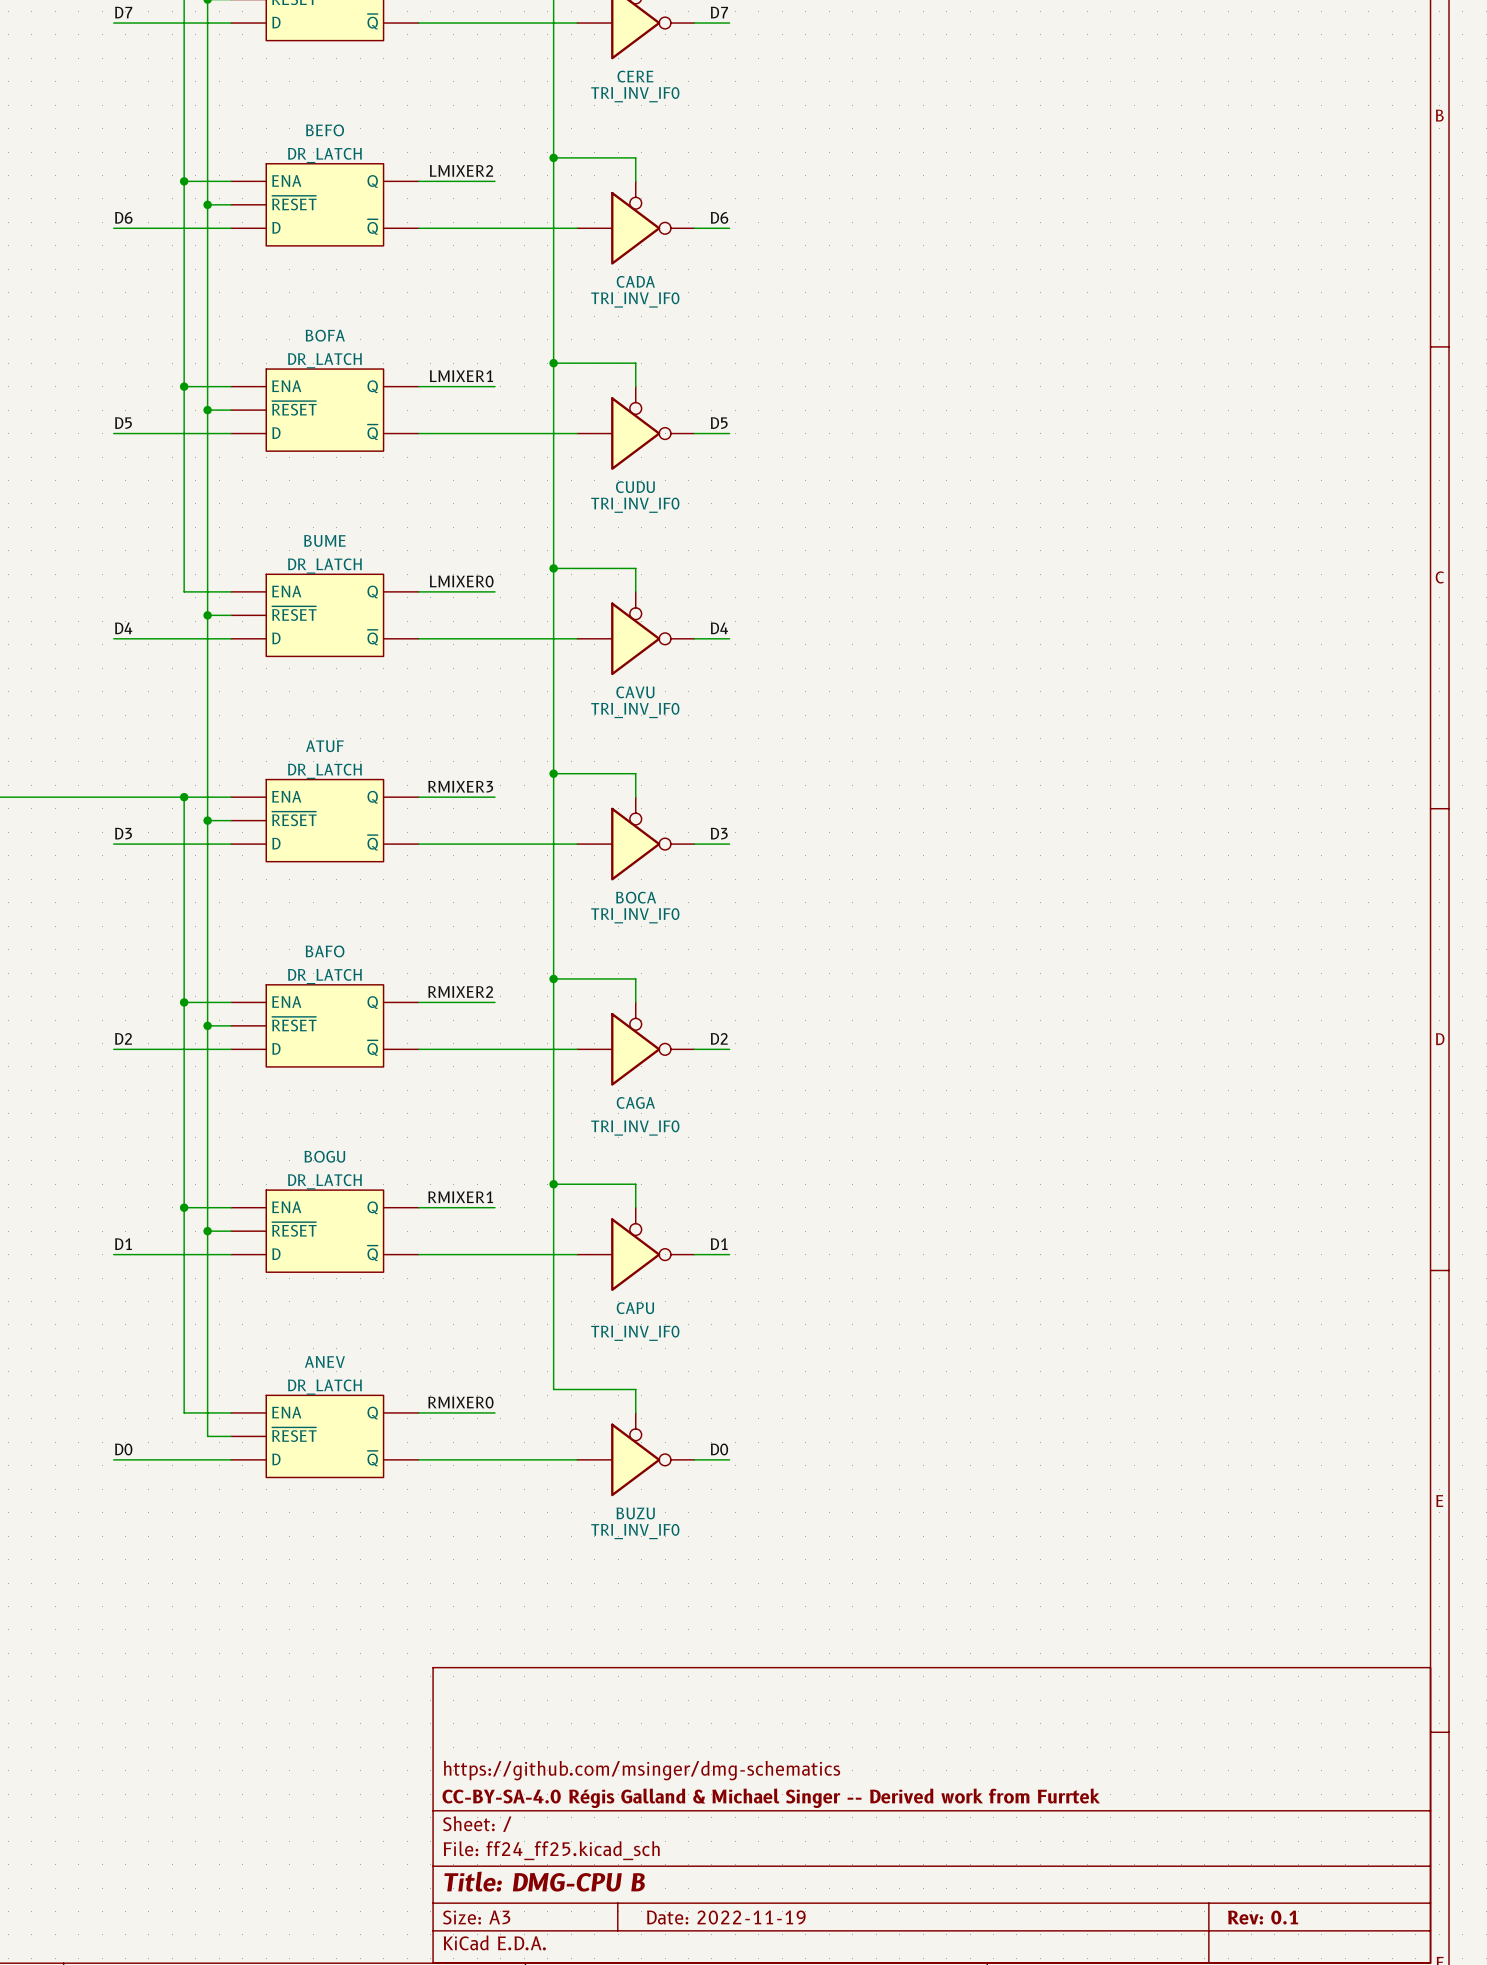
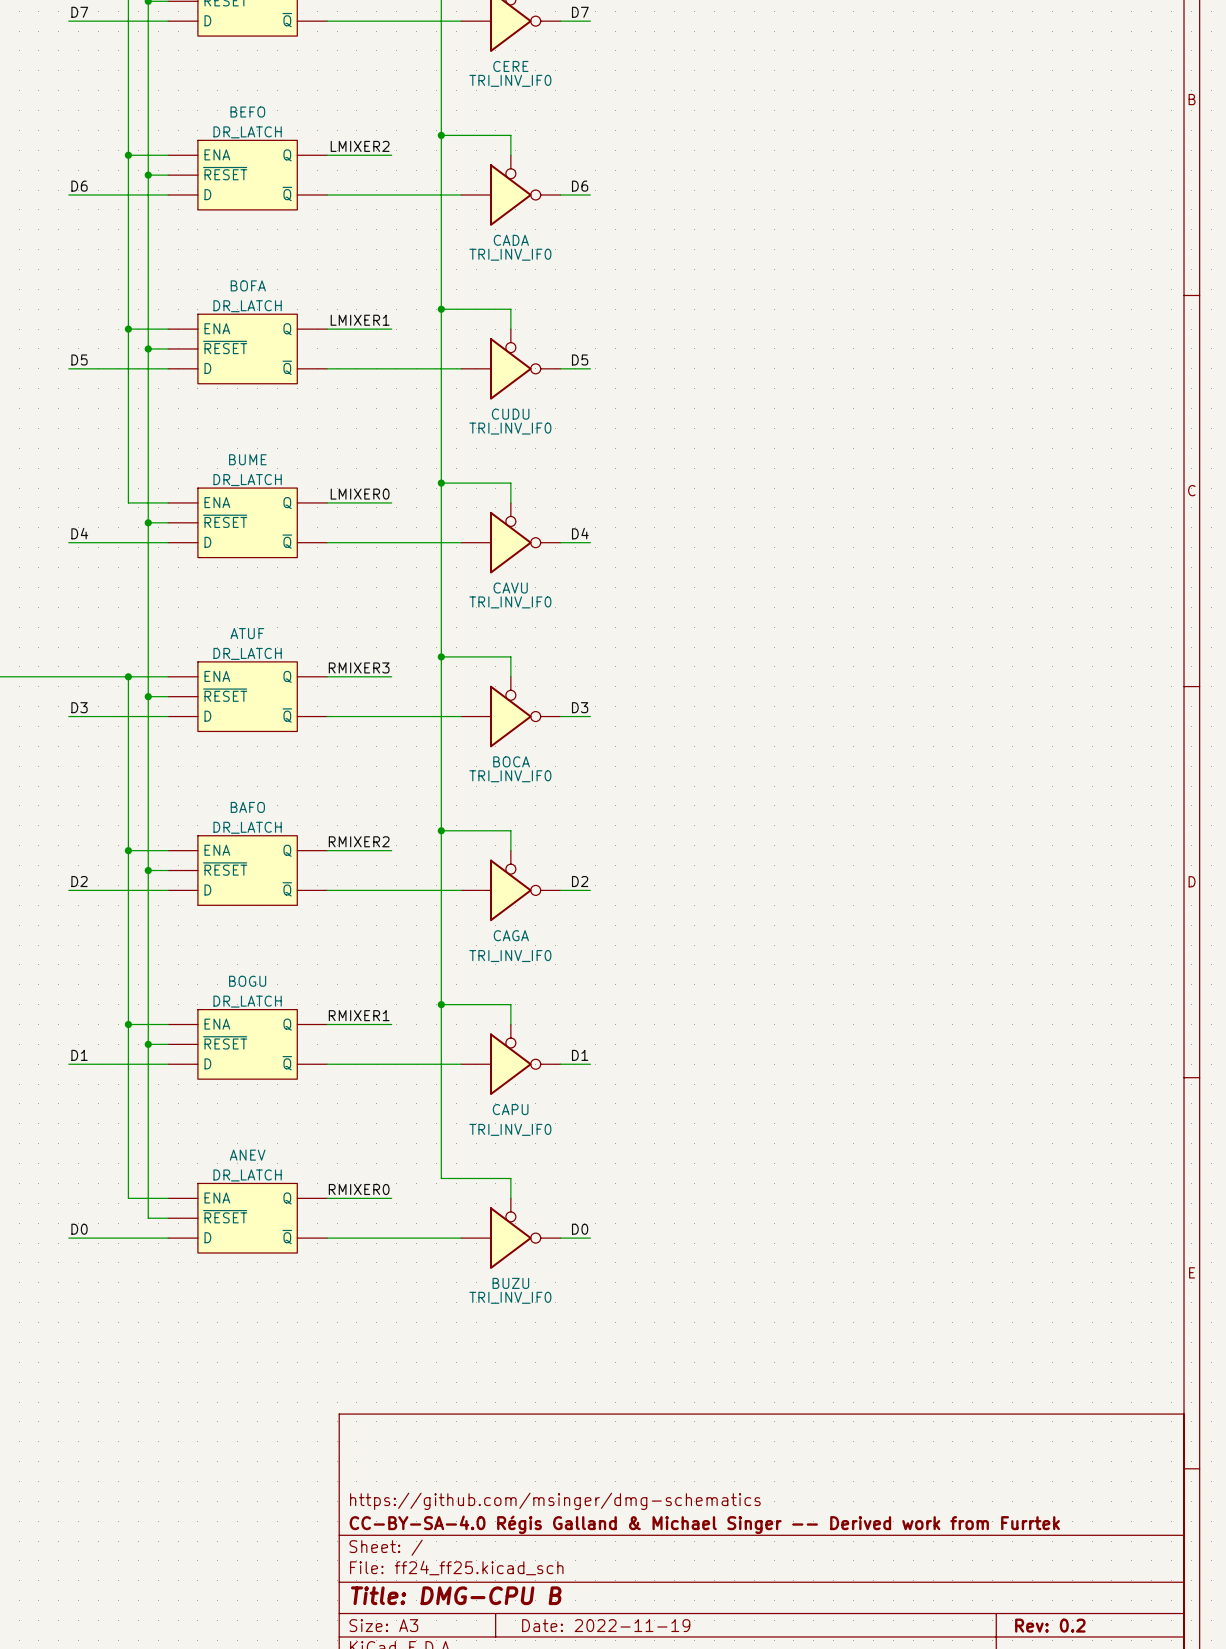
title block: Rev: 0.1 (1263, 1917) -> Rev: 0.2 (1050, 1625)

